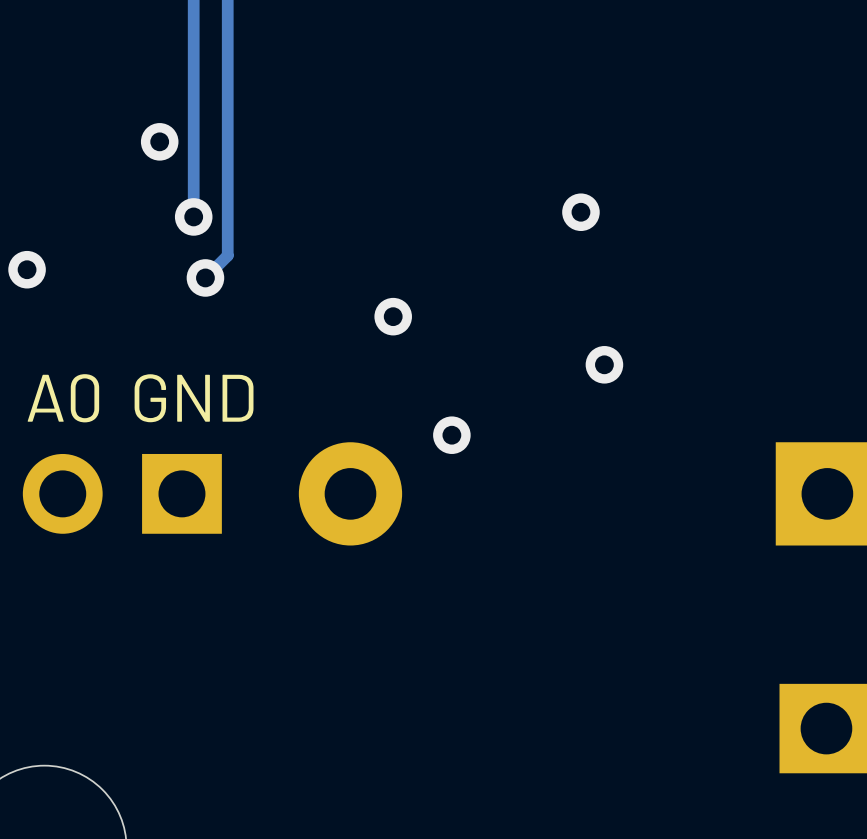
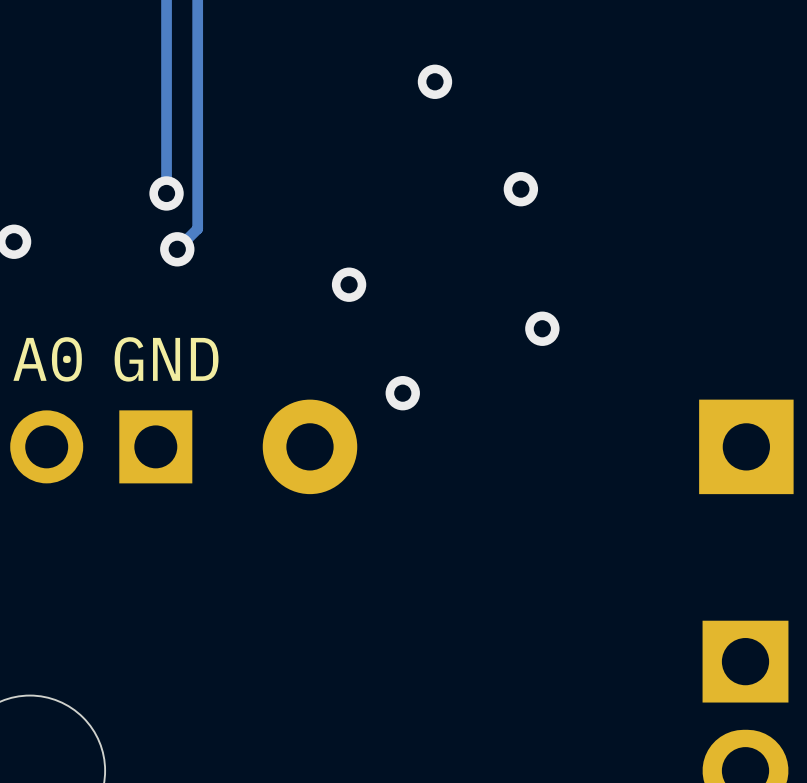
via: none -> (434, 81)
via: (159, 141) -> none

